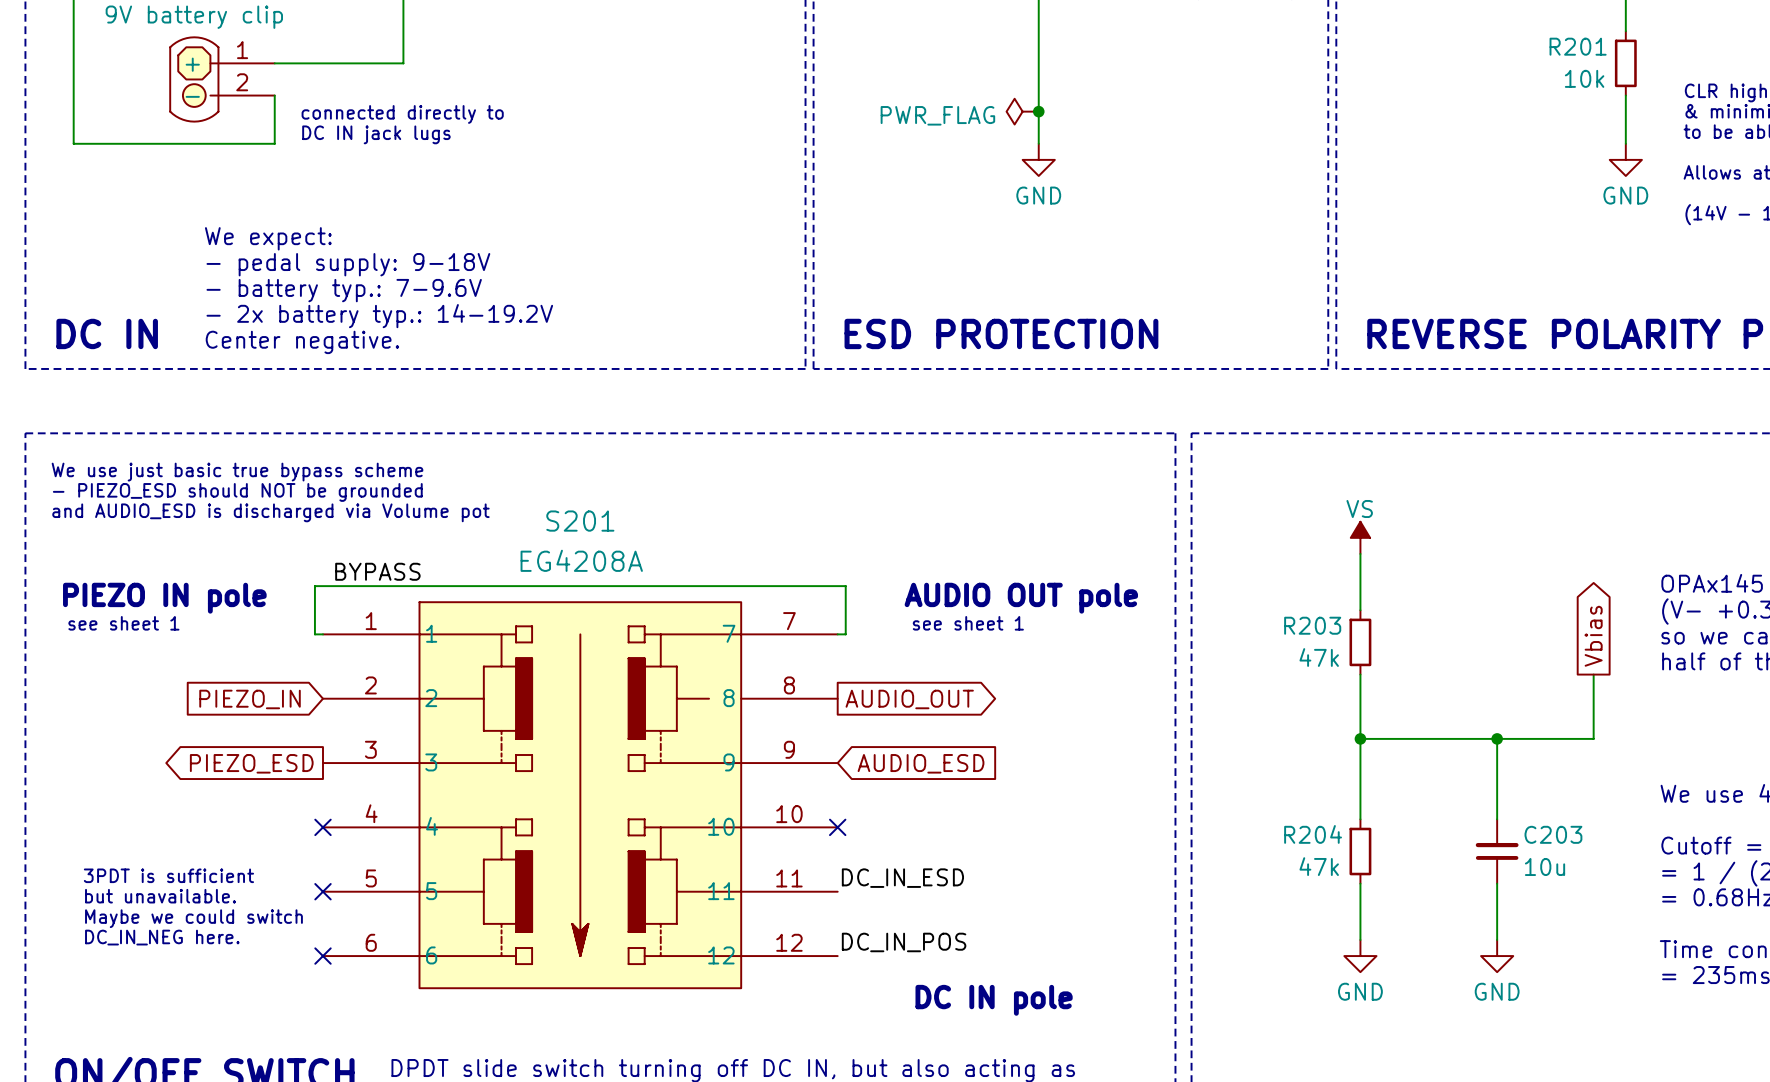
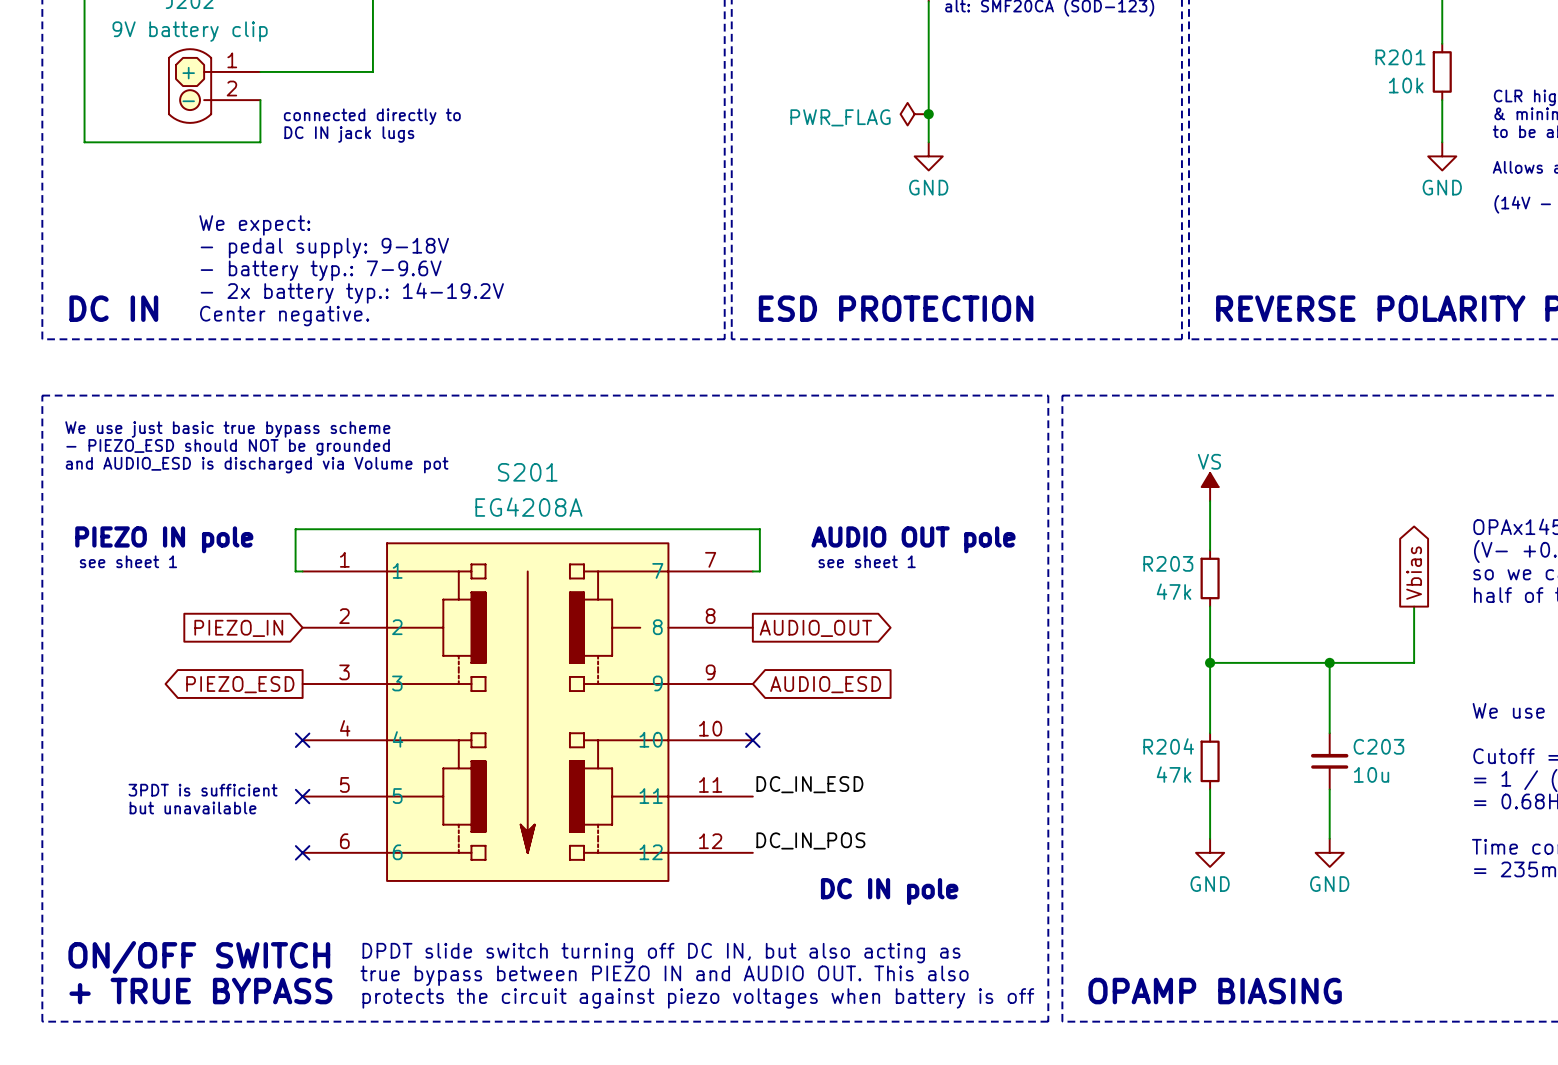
label: BYPASS (377, 571) -> none
text position: 3PDT is sufficient (168, 875) -> 3PDT is sufficient (203, 790)
text: but unavailable. (160, 896) -> but unavailable (193, 807)
text: Maybe we could switch (193, 918) -> none
text: DC_IN_NEG here. (162, 937) -> none

